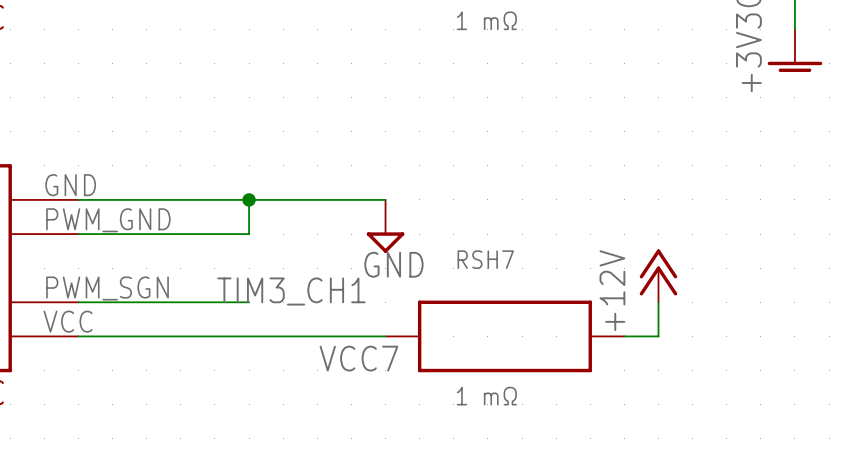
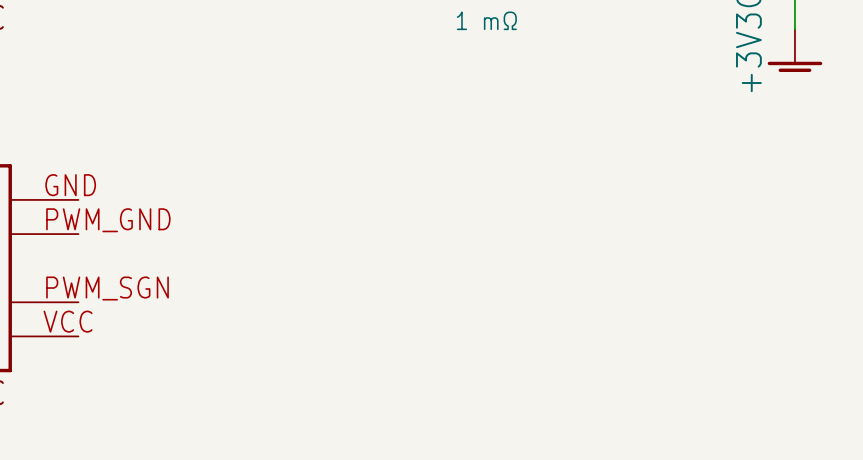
wire: (78, 199) (385, 199) -> none
wire: (249, 199) (249, 234) (78, 234) -> none
junction: (249, 199) -> none
power symbol: GND (385, 226) -> none
power symbol: +12V (658, 275) -> none
label: TIM3_CH1 (291, 291) -> none
wire: (78, 302) (249, 302) -> none
wire: (658, 302) (658, 336) (624, 336) -> none
wire: (78, 336) (385, 336) -> none
RSH7: 1 mΩ (504, 336) -> none
label: VCC7 (358, 358) -> none

